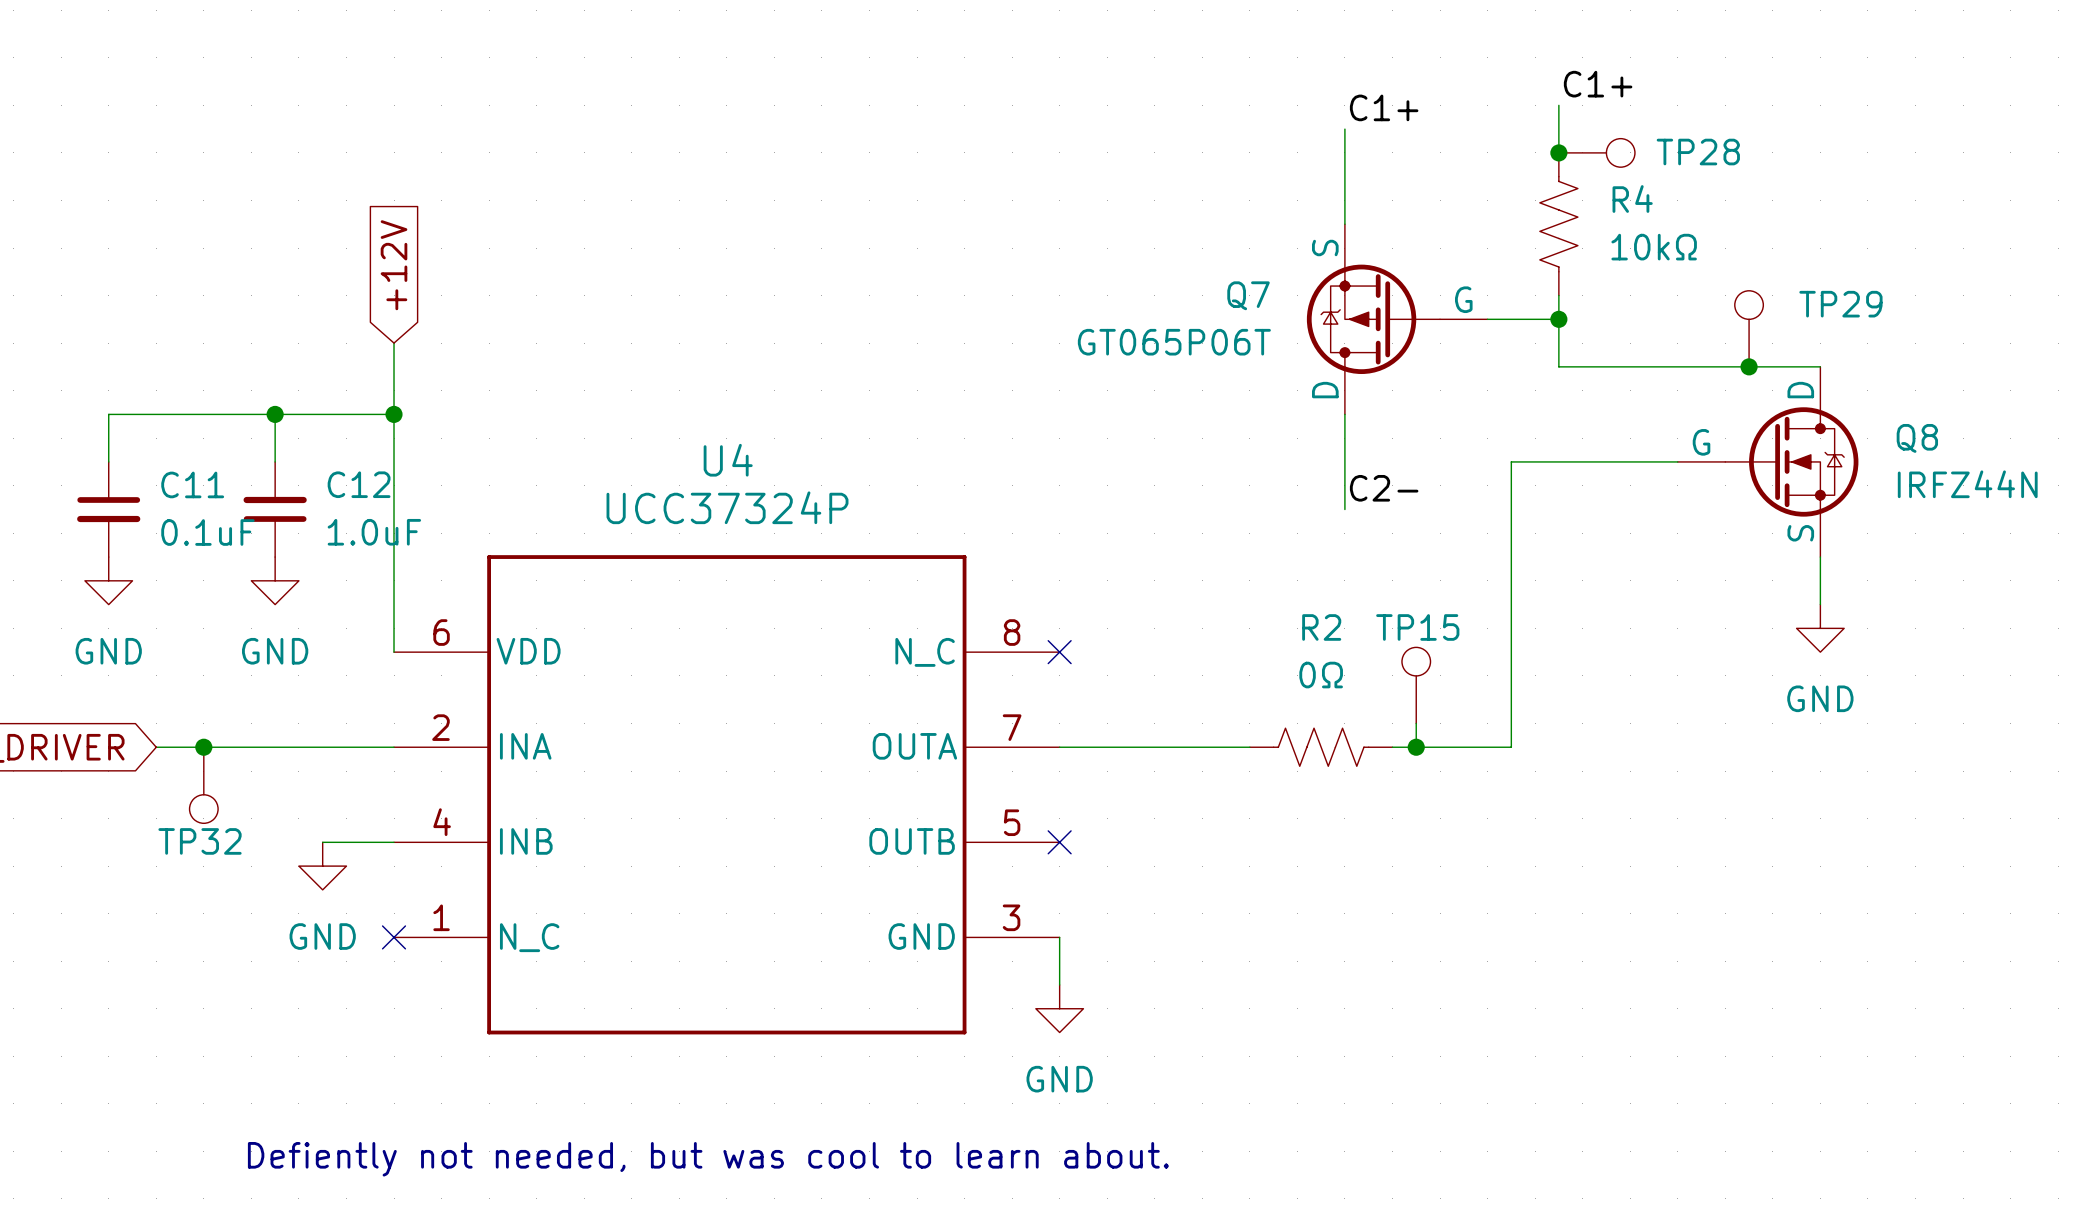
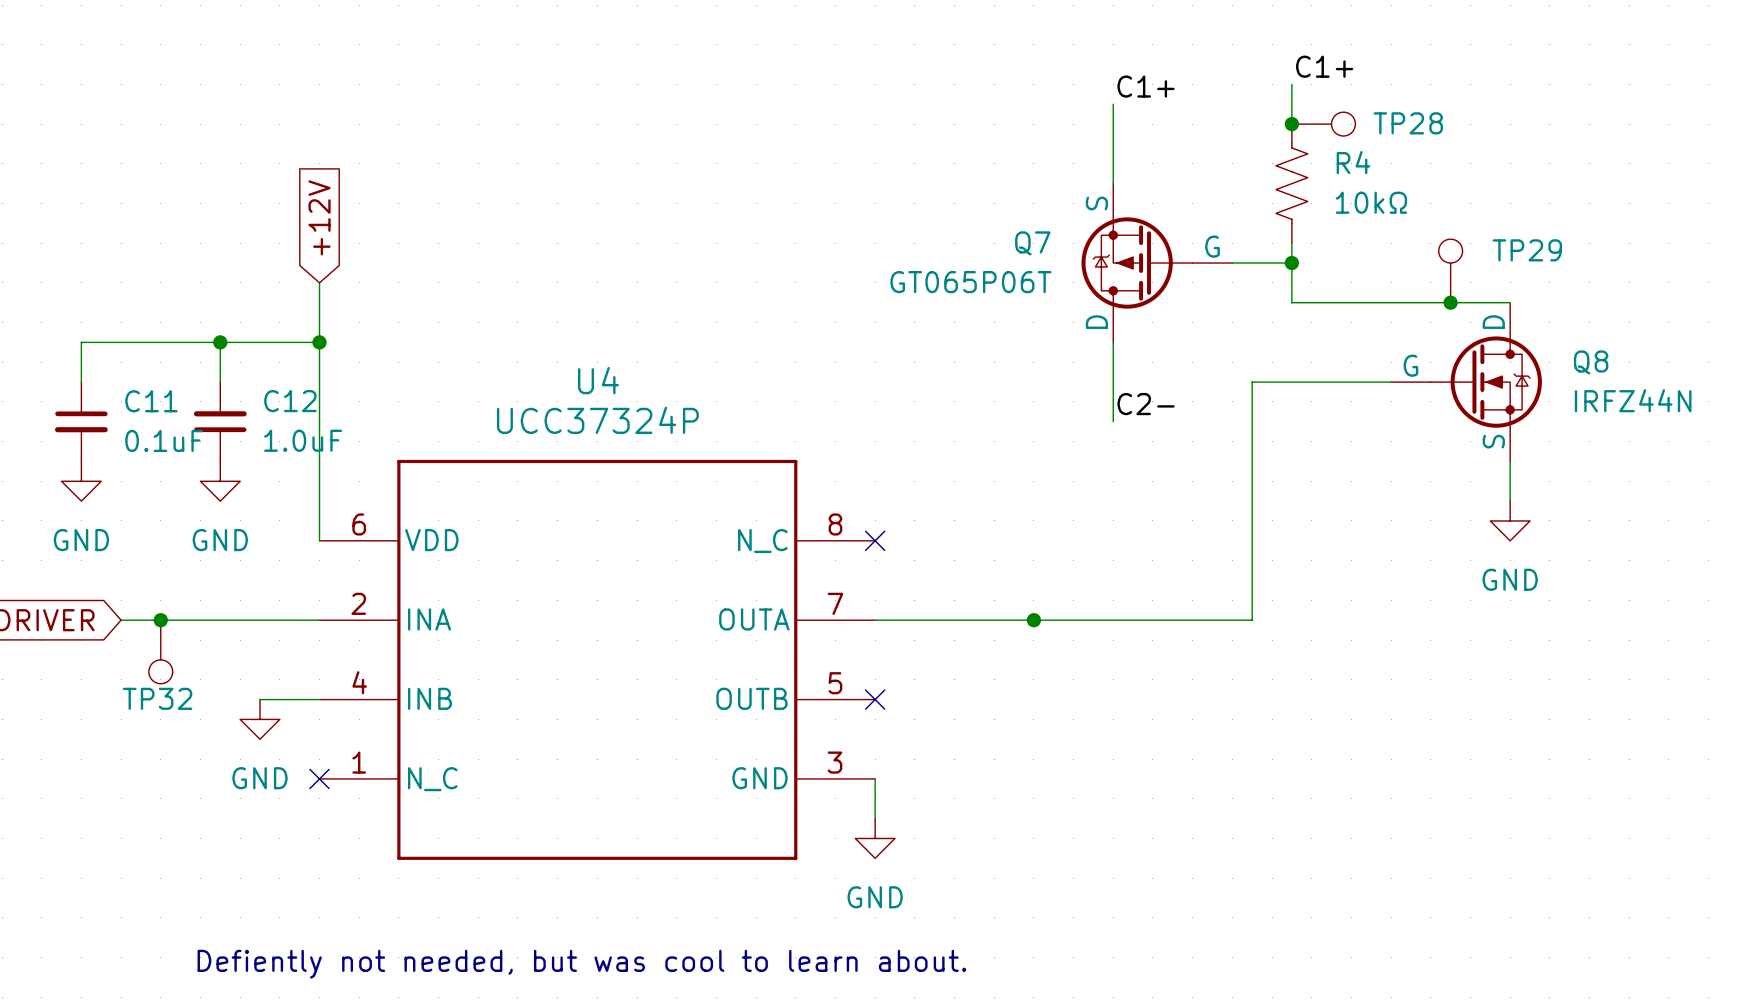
TP15: (1416, 685) -> none
wire: (1416, 723) (1416, 747) -> none
wire: none -> (1033, 620) (1152, 620)
junction: none -> (1033, 620)
R2: 0Ω (1321, 747) -> none
junction: (1416, 747) -> none

